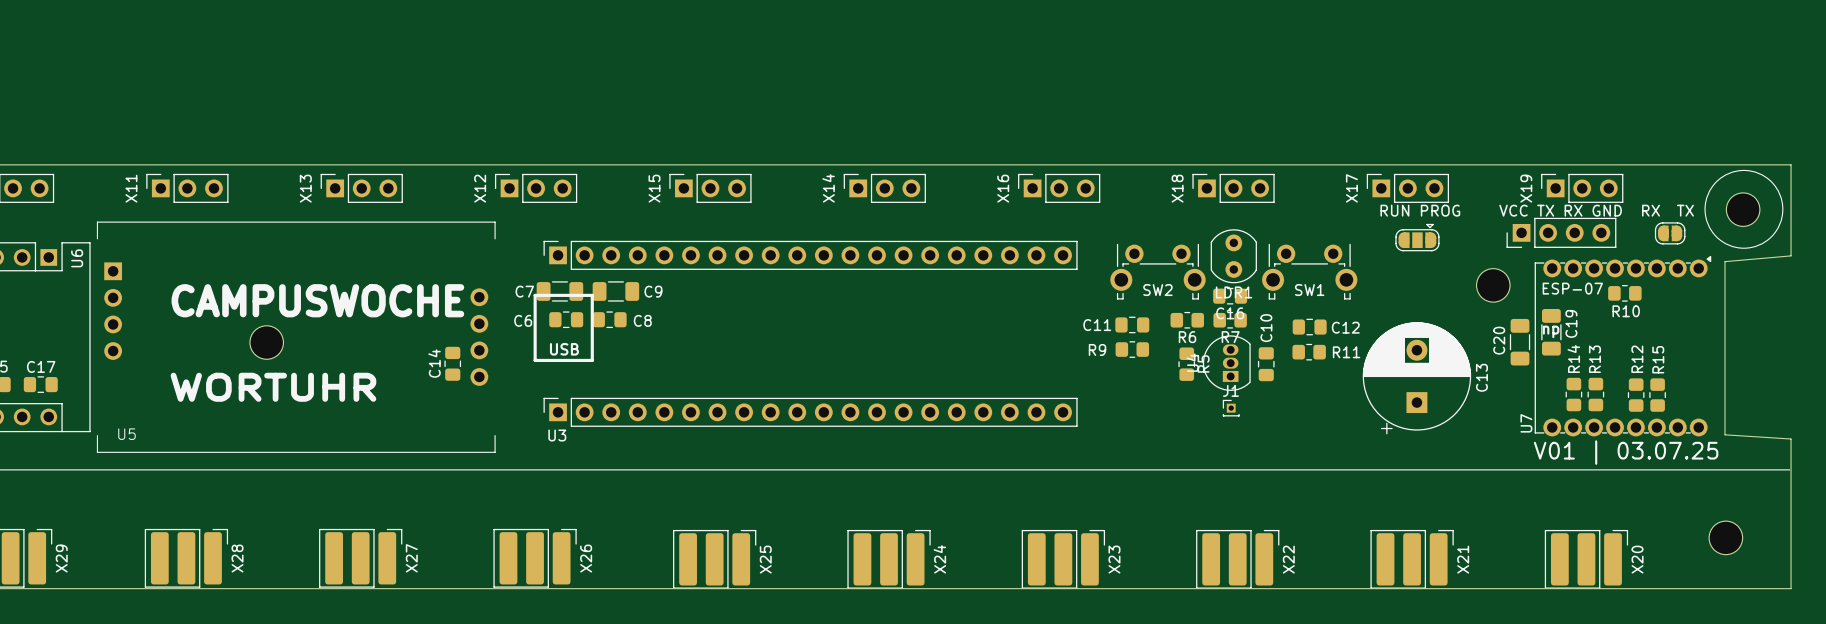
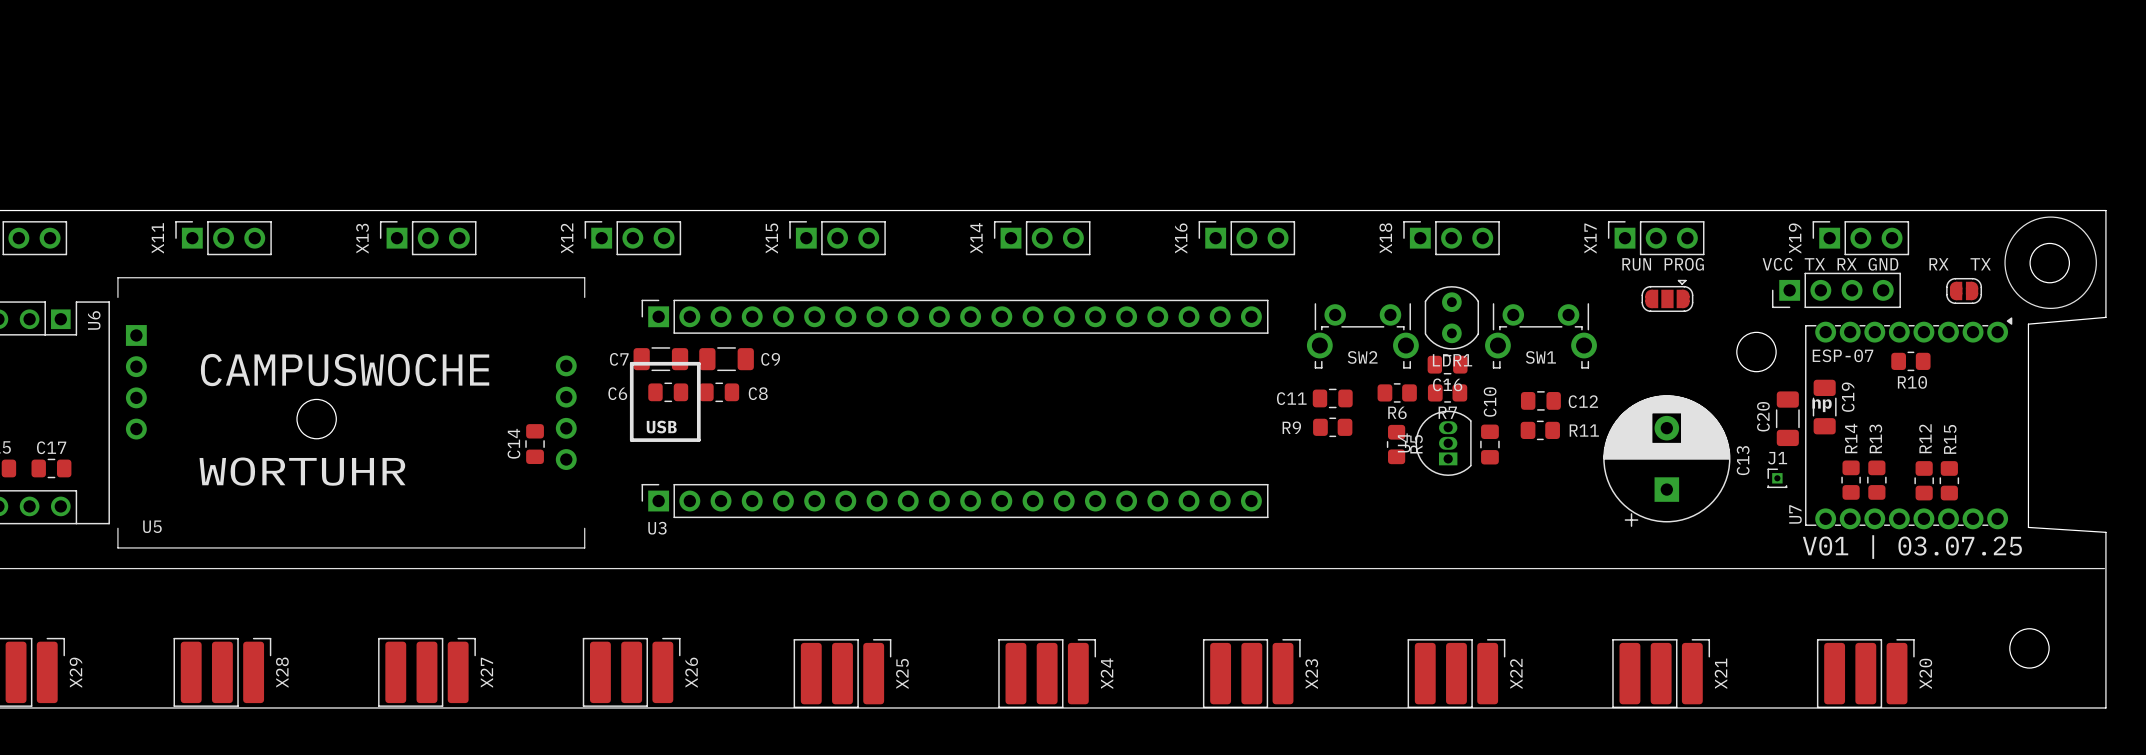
J1 position: (1231, 408) -> (1777, 478)

